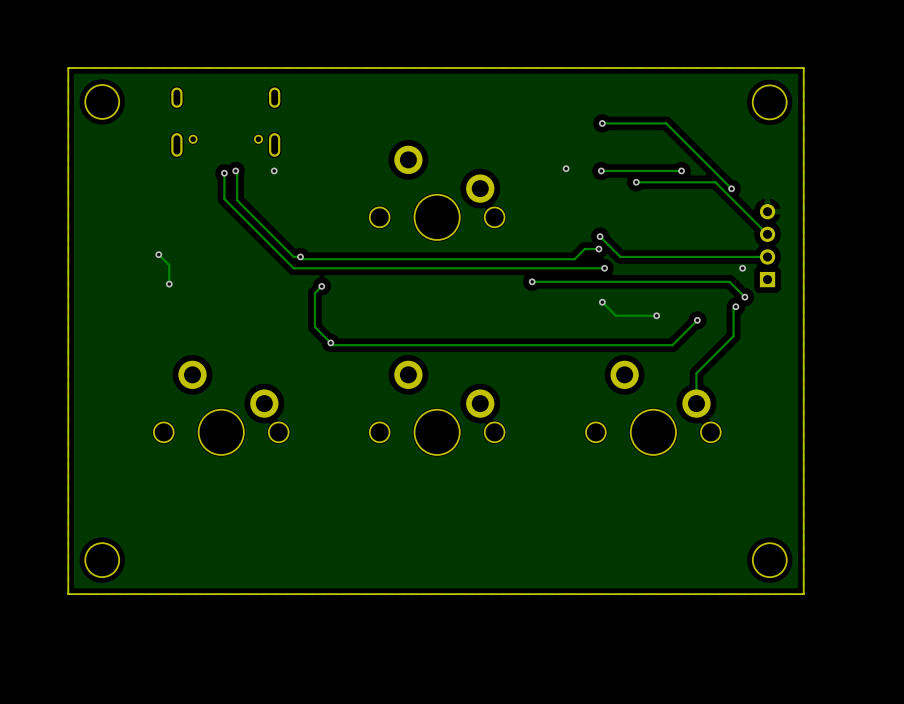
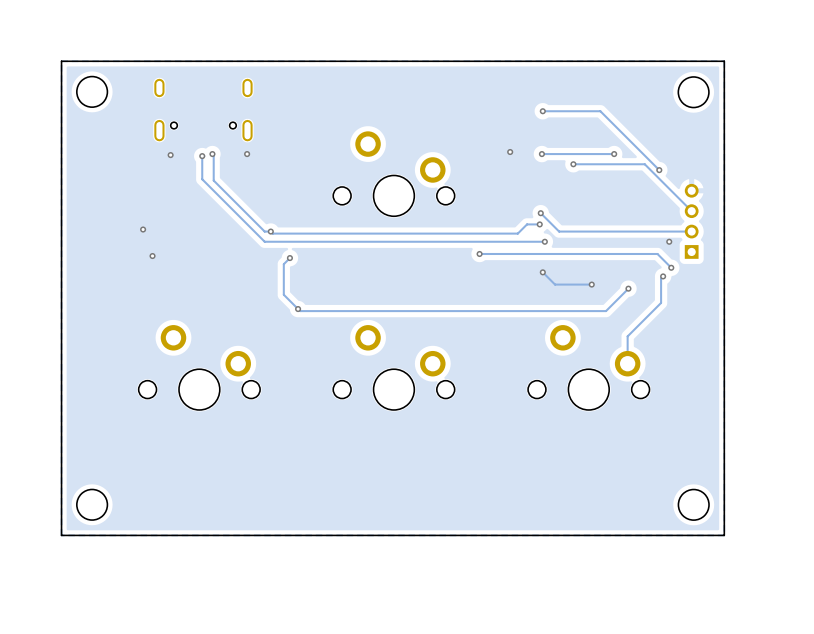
via: none -> (170, 155)
track: (158, 254) (169, 265) (169, 284) -> none

